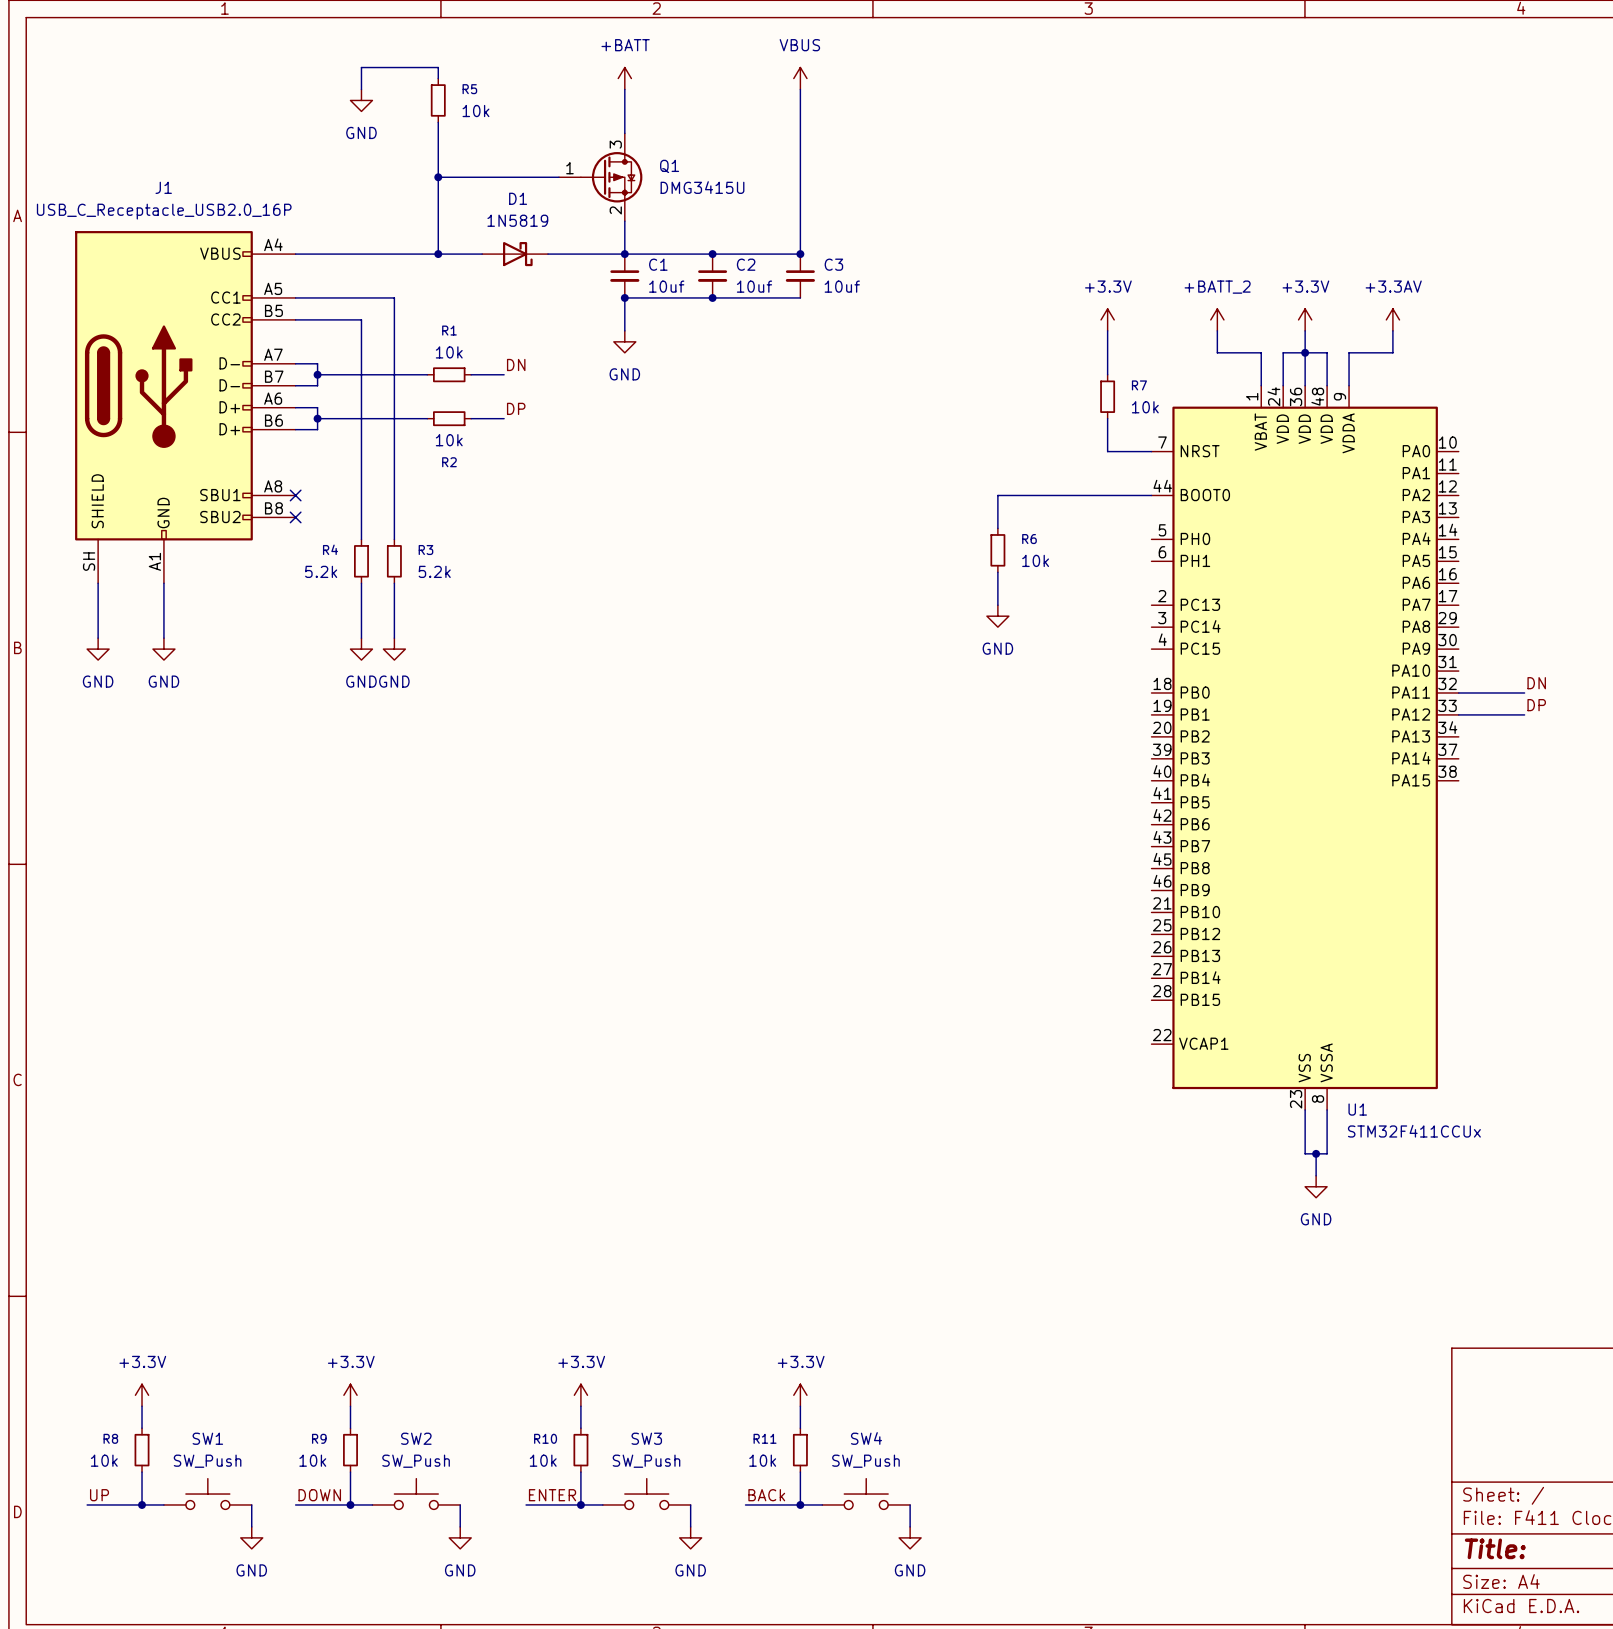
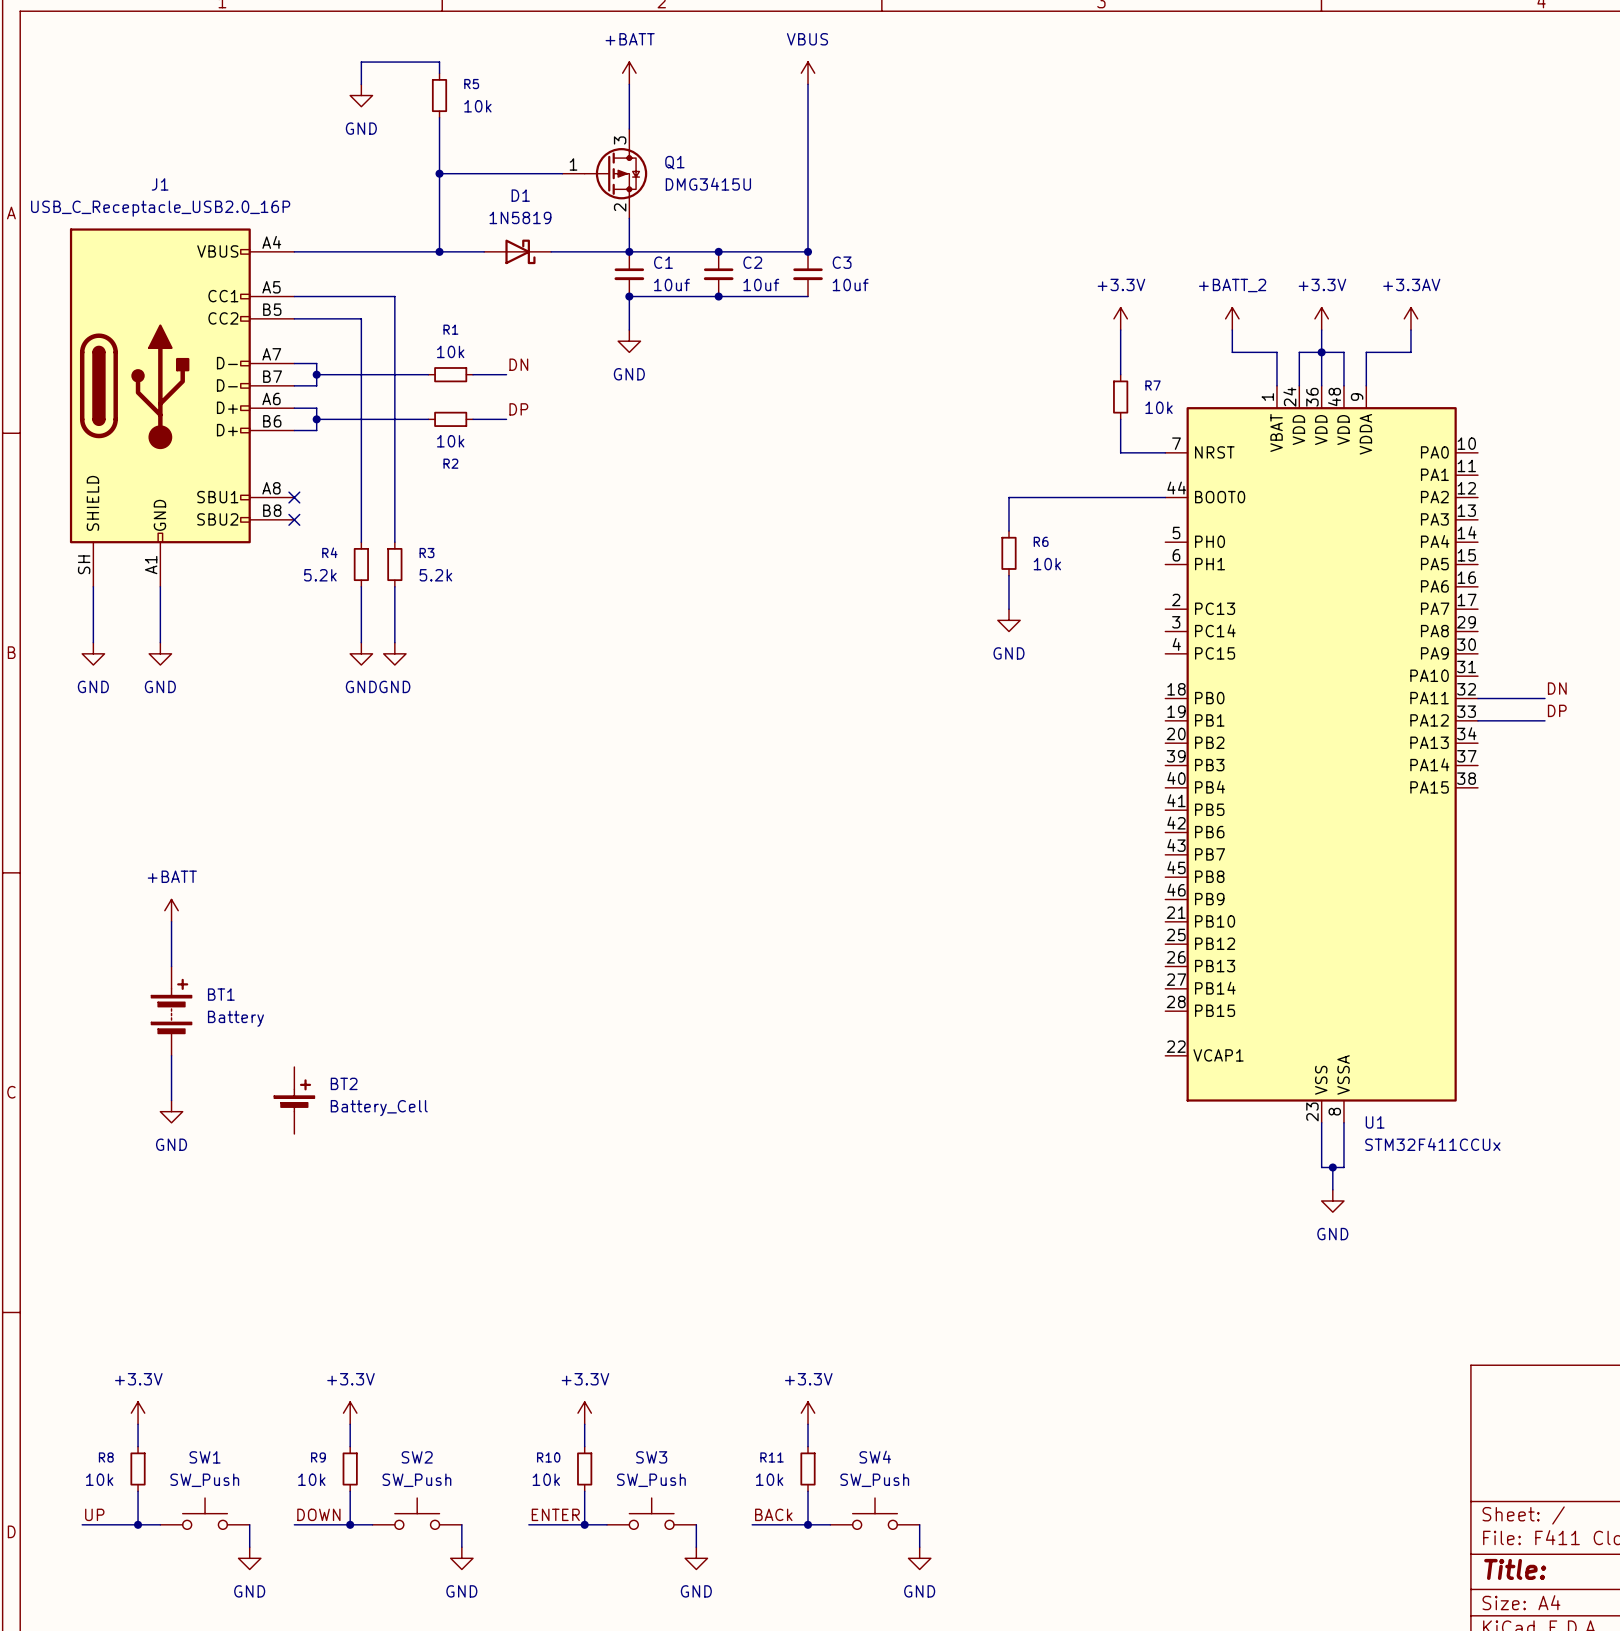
power symbol: none -> +BATT (171, 910)
wire: none -> (171, 921) (171, 966)
BT1: none -> Battery (171, 1011)
wire: none -> (171, 1055) (171, 1100)
BT2: none -> Battery_Cell (294, 1100)
power symbol: none -> GND (171, 1111)

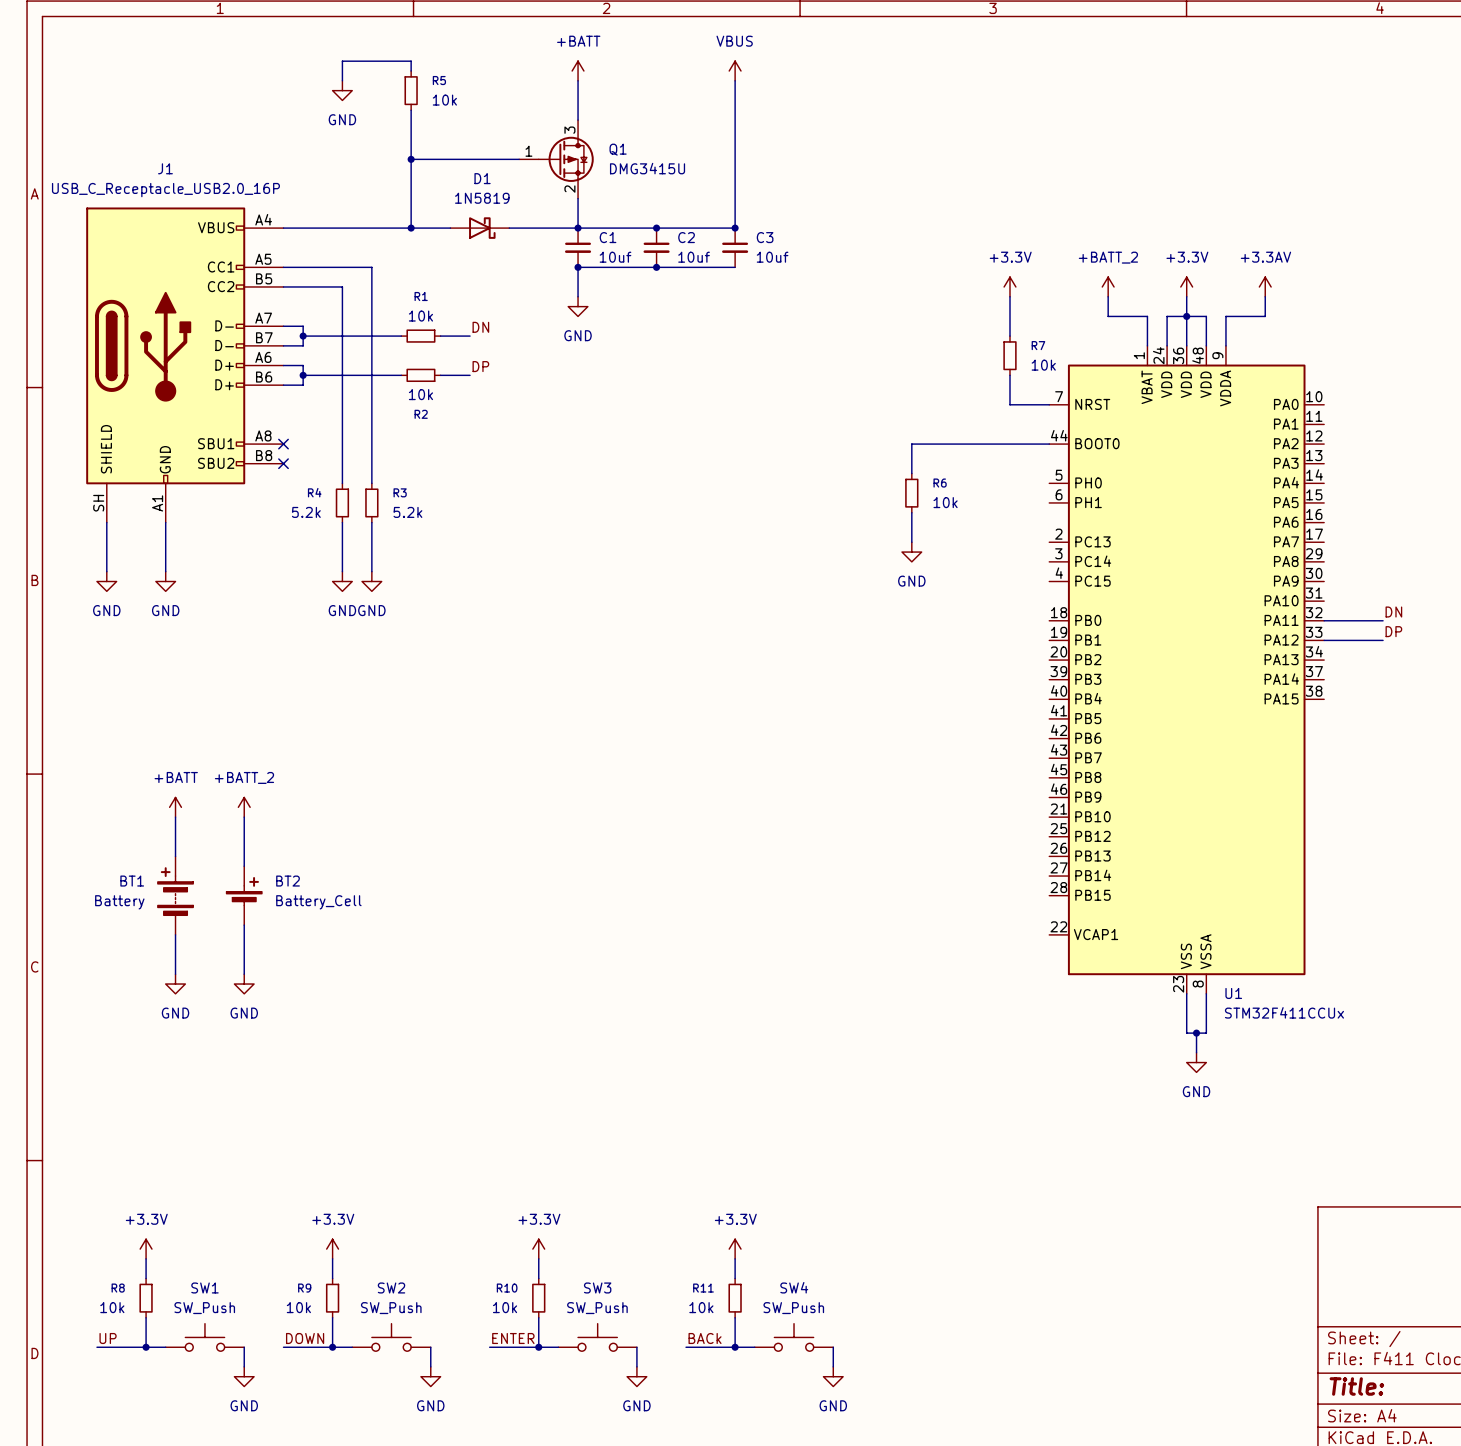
power symbol: none -> +BATT_2 (244, 807)
wire: none -> (244, 817) (244, 866)
BT1 flip: as is (171, 1006) -> left-right (175, 891)
wire: none -> (244, 925) (244, 974)
BT2 position: (294, 1100) -> (244, 895)
power symbol: none -> GND (244, 984)

